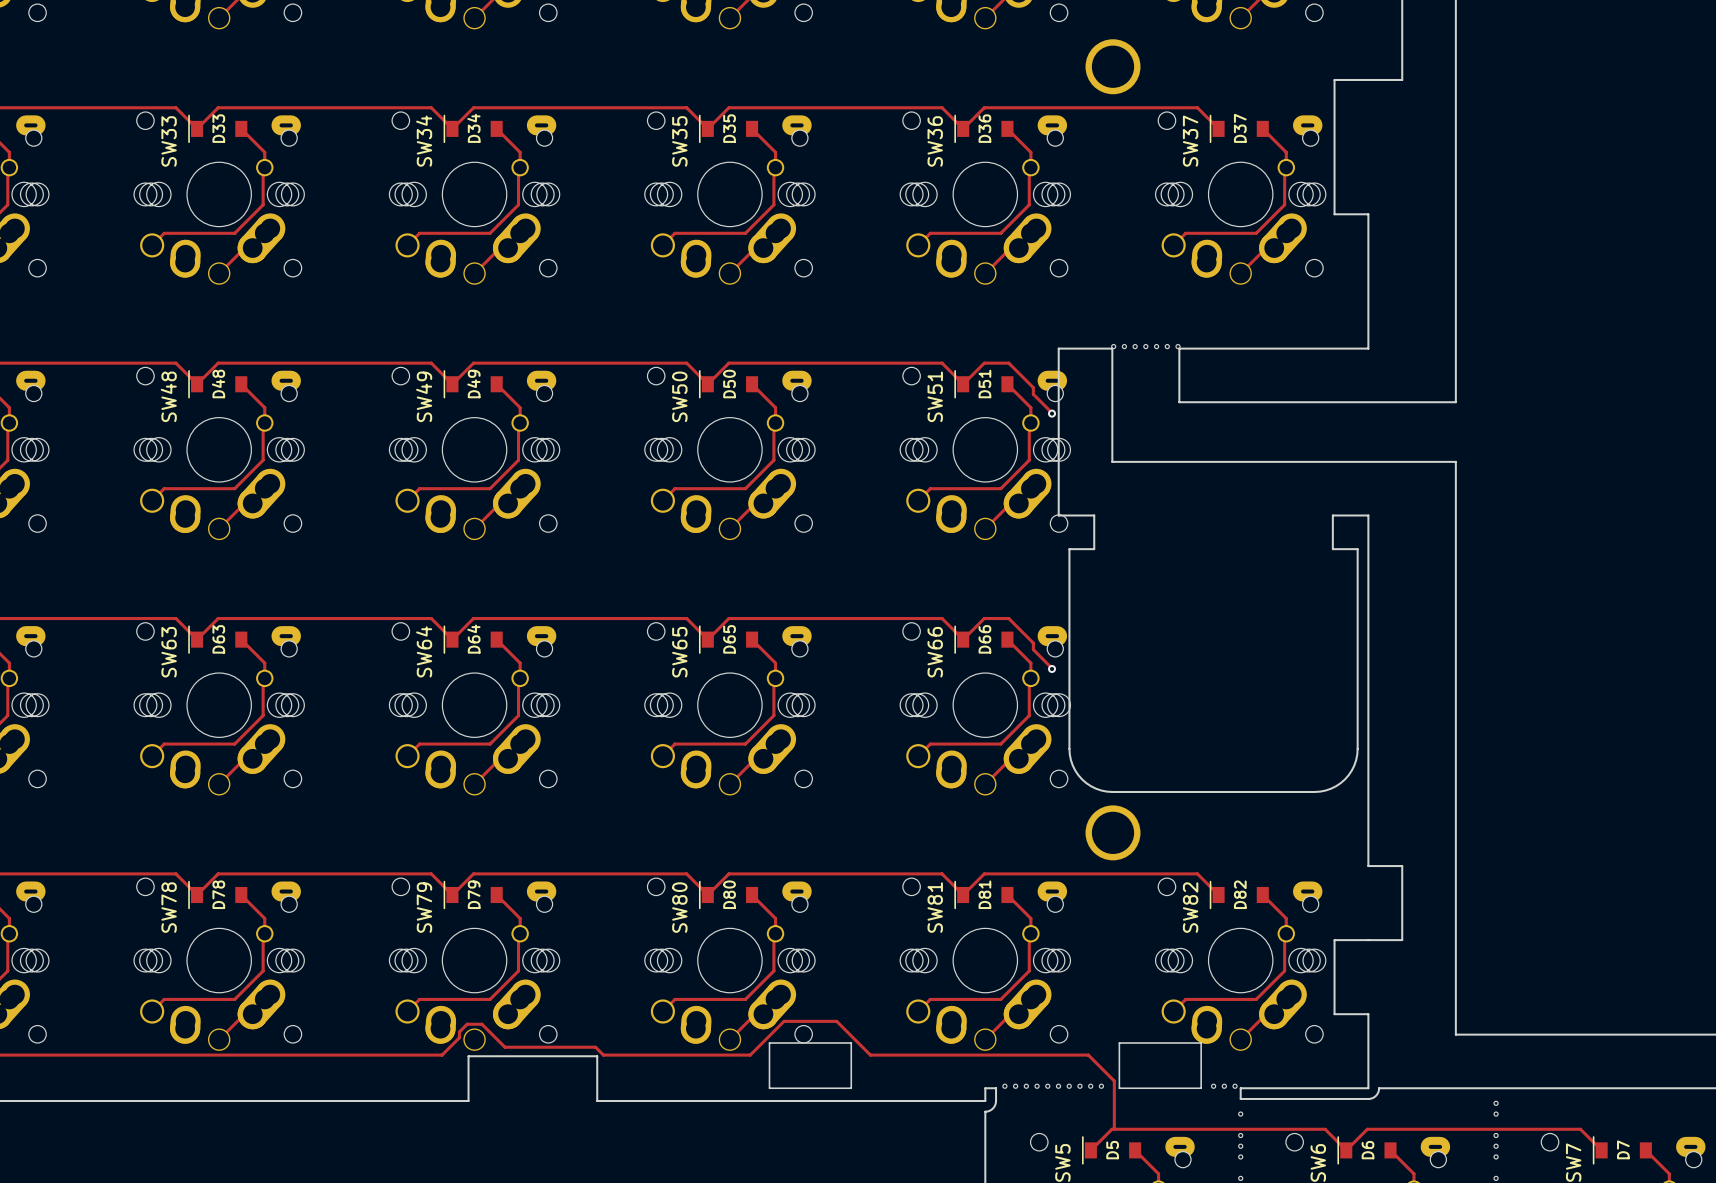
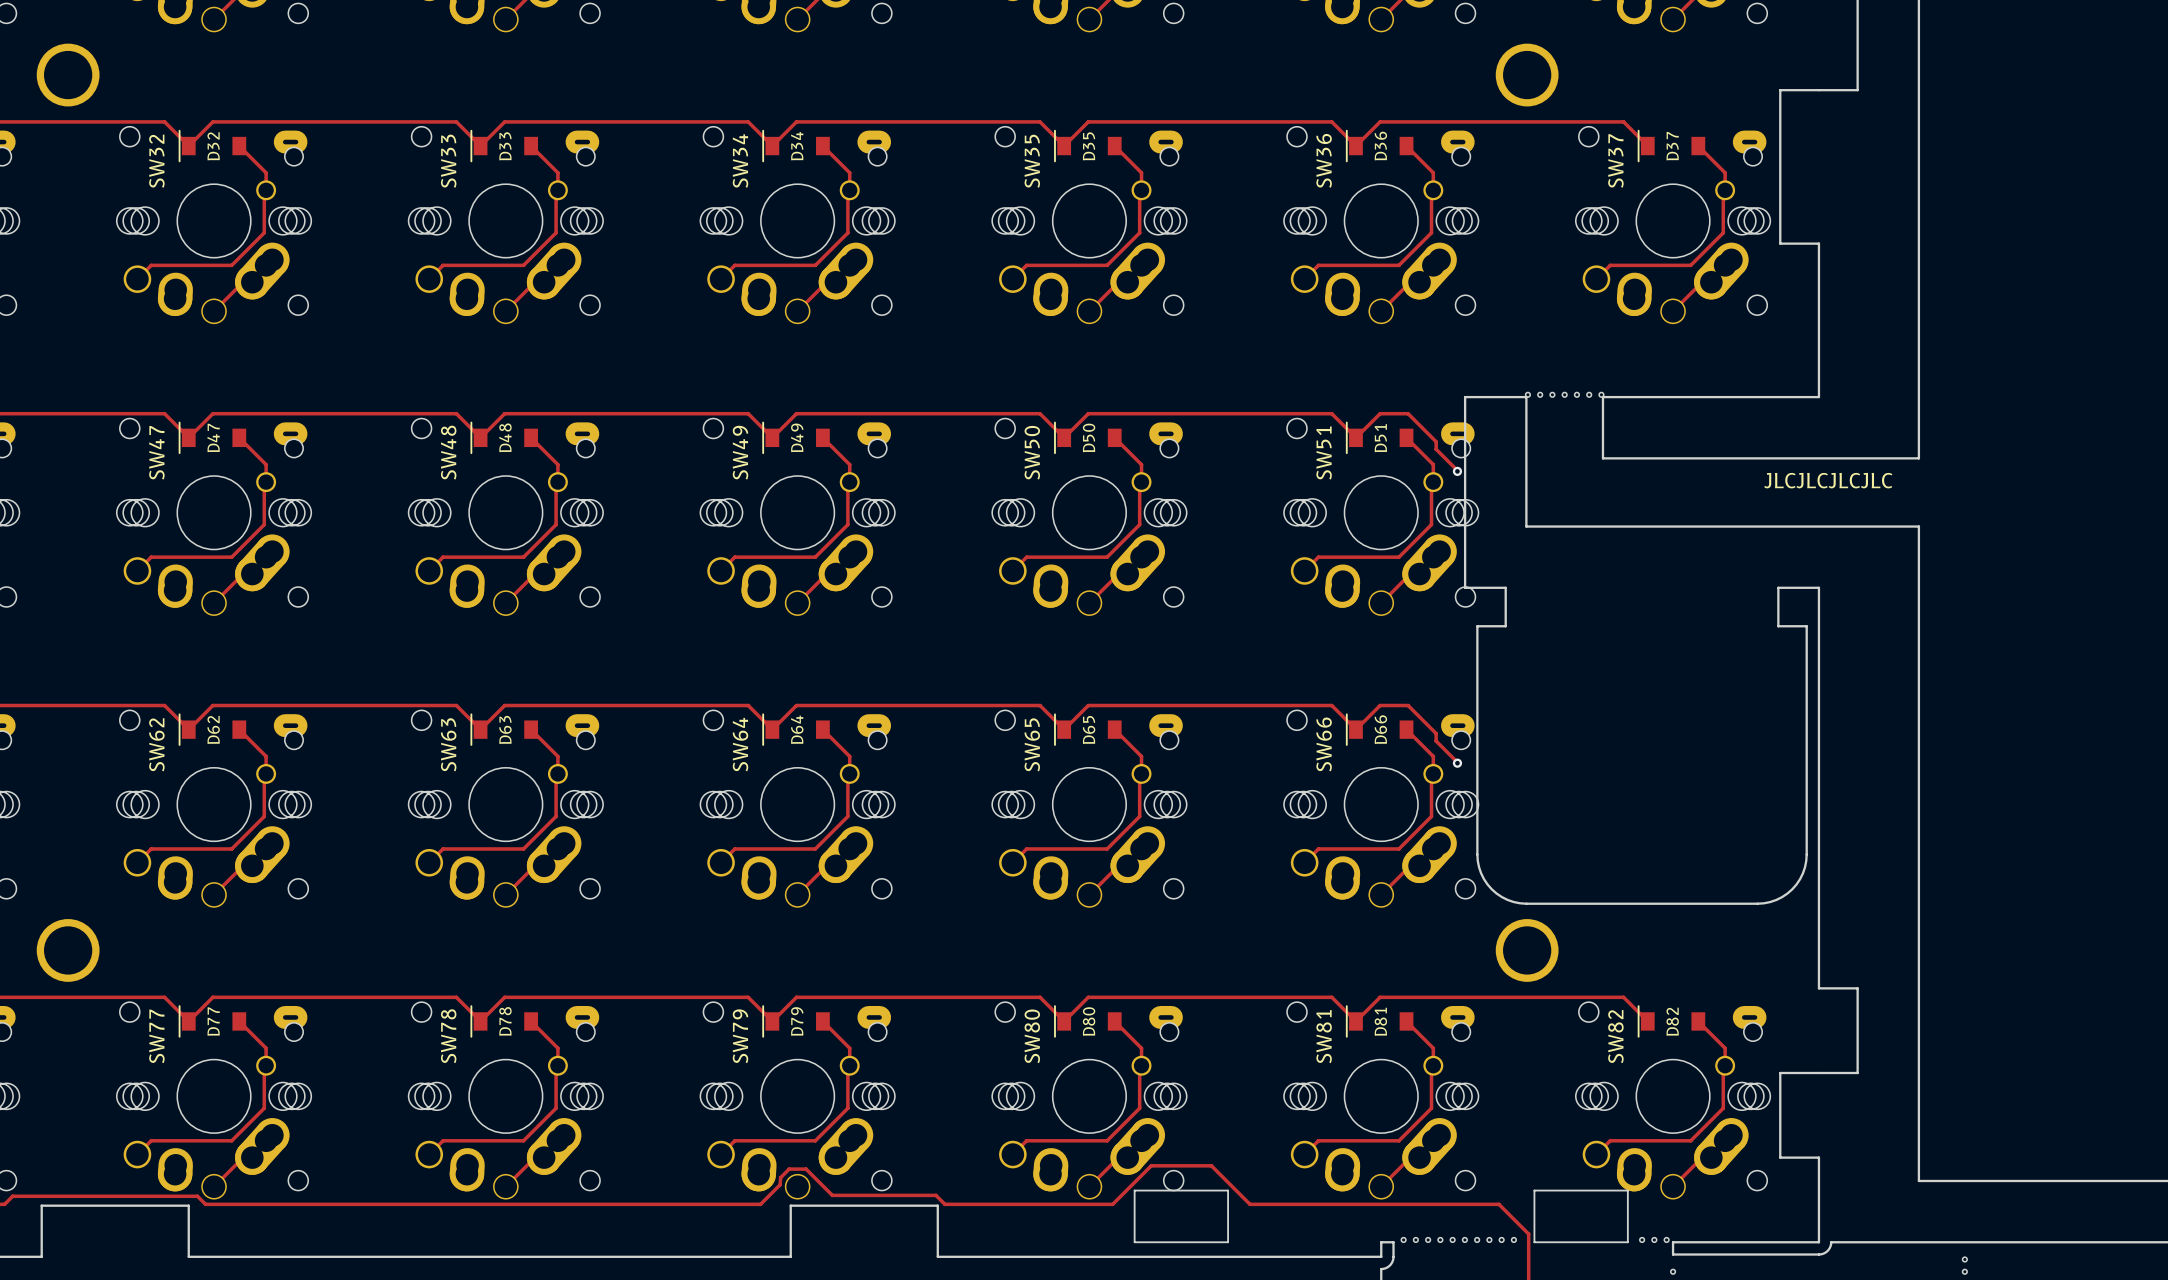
text: none -> JLCJLCJLCJLC (1828, 480)

